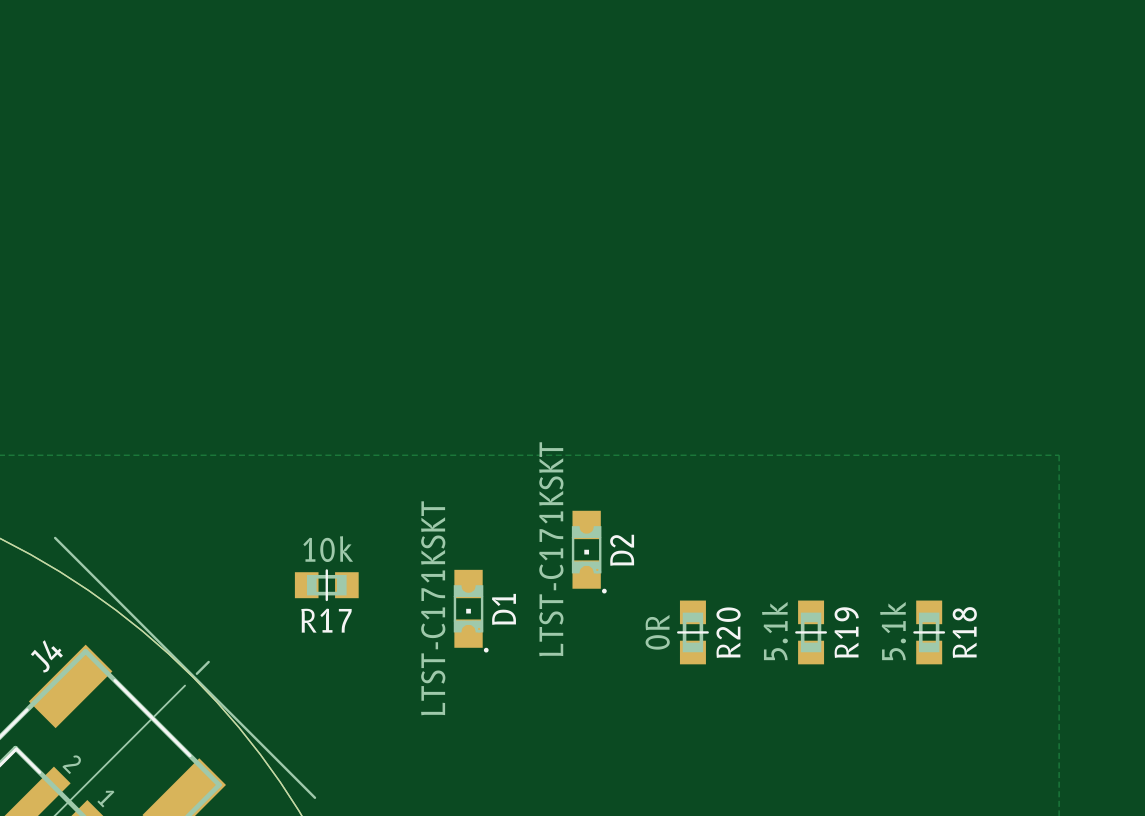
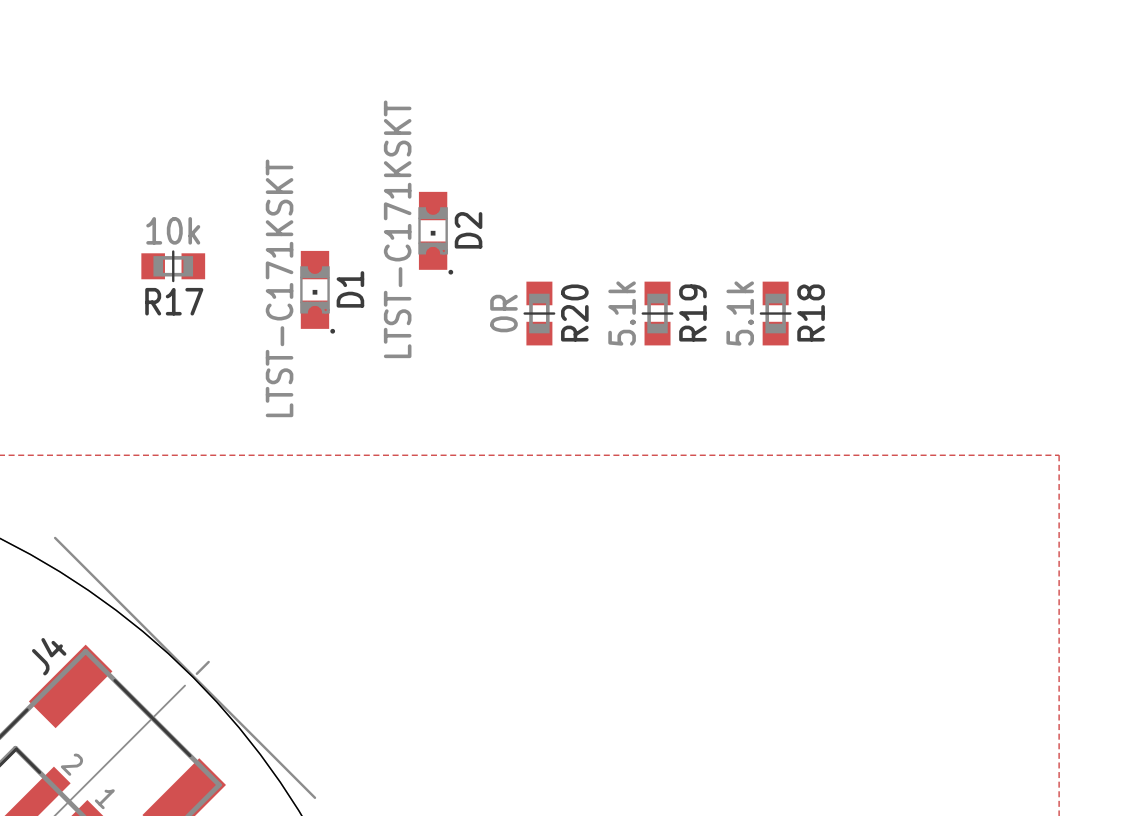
D2 position: (589, 552) -> (435, 233)
R17 position: (326, 585) -> (173, 266)
D1 position: (471, 611) -> (317, 292)
R20 position: (692, 632) -> (539, 313)
R19 position: (811, 632) -> (657, 313)
R18 position: (929, 632) -> (775, 313)

